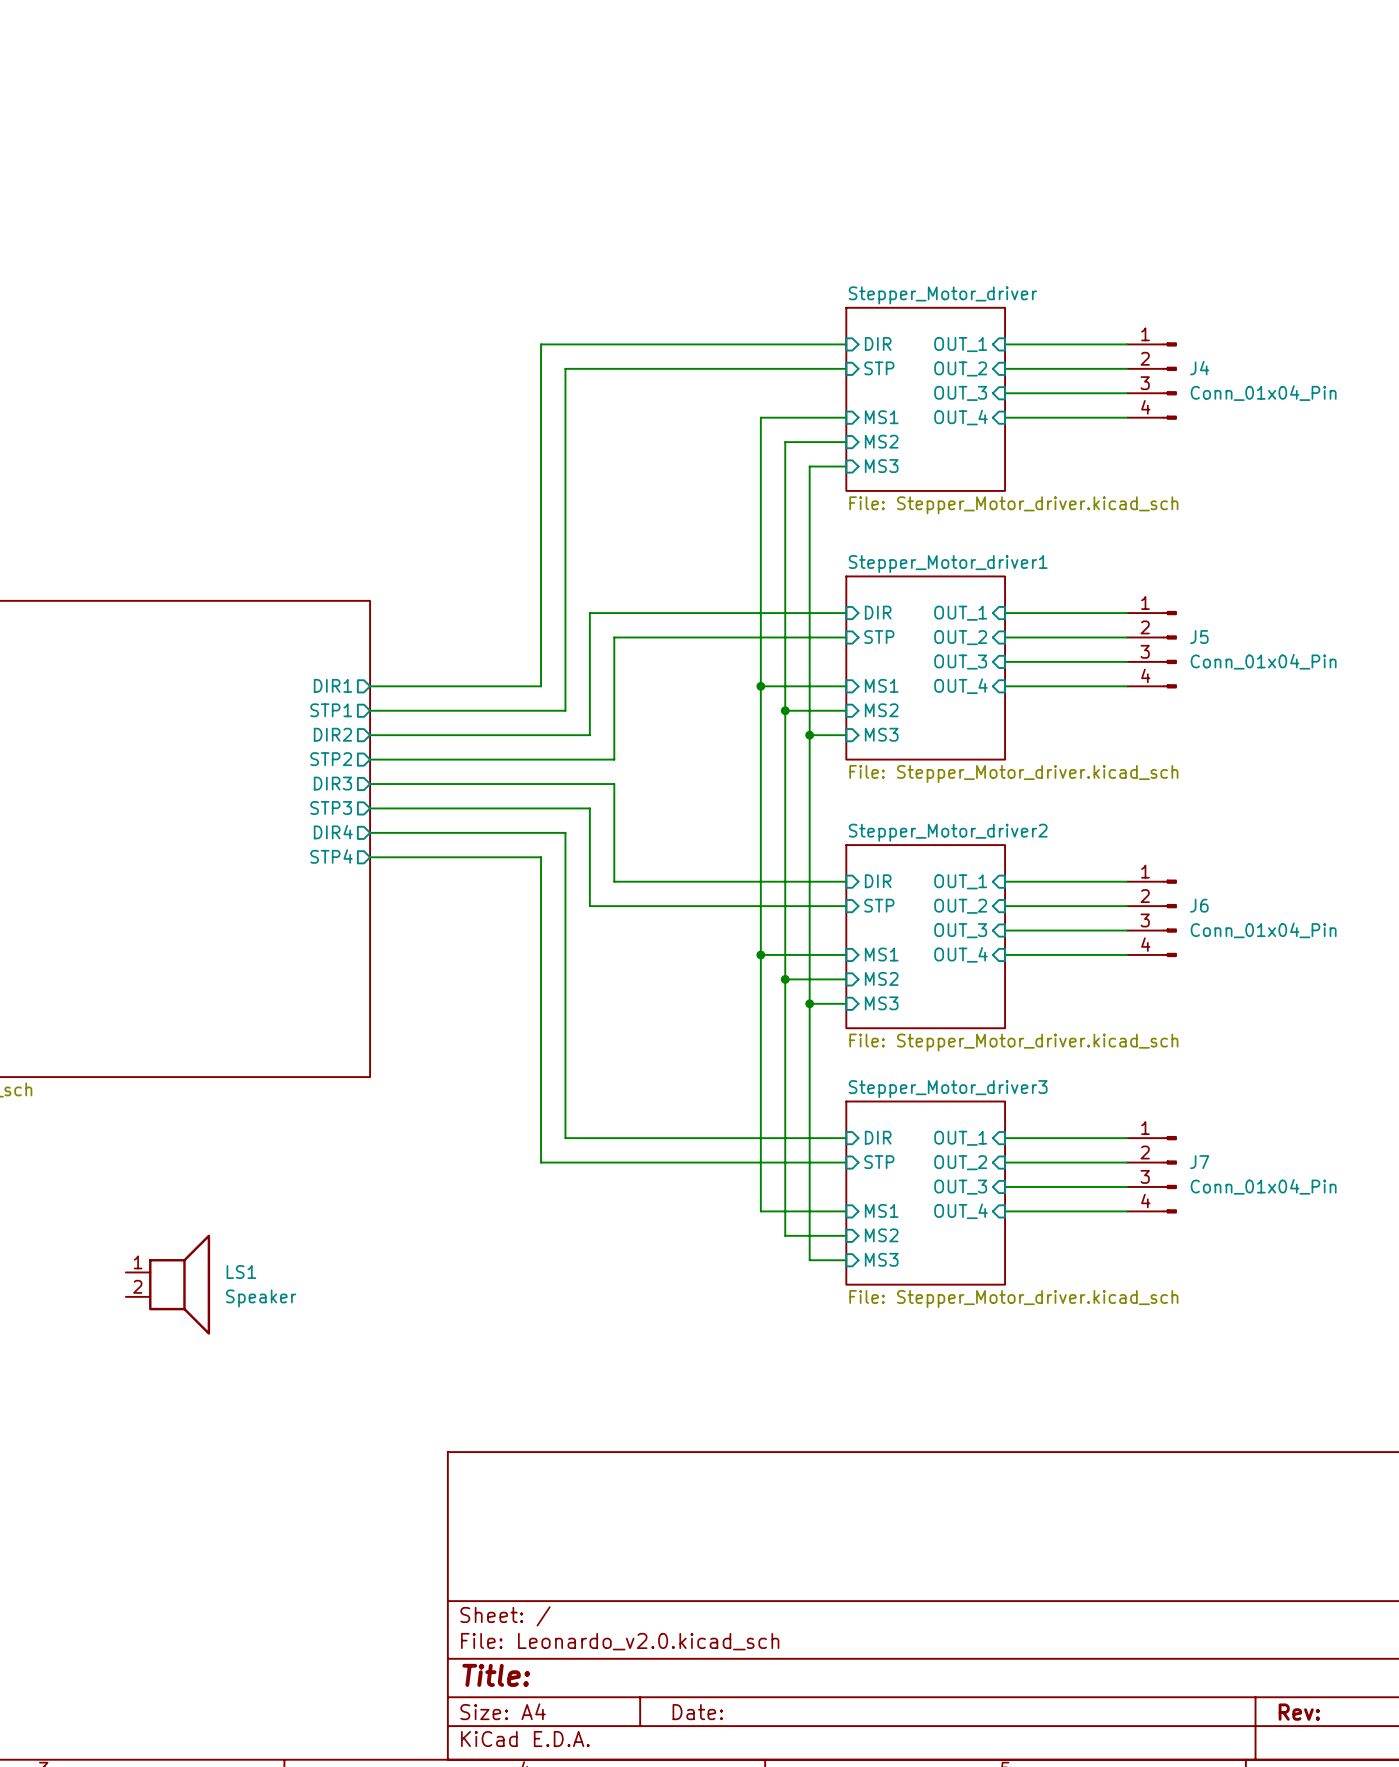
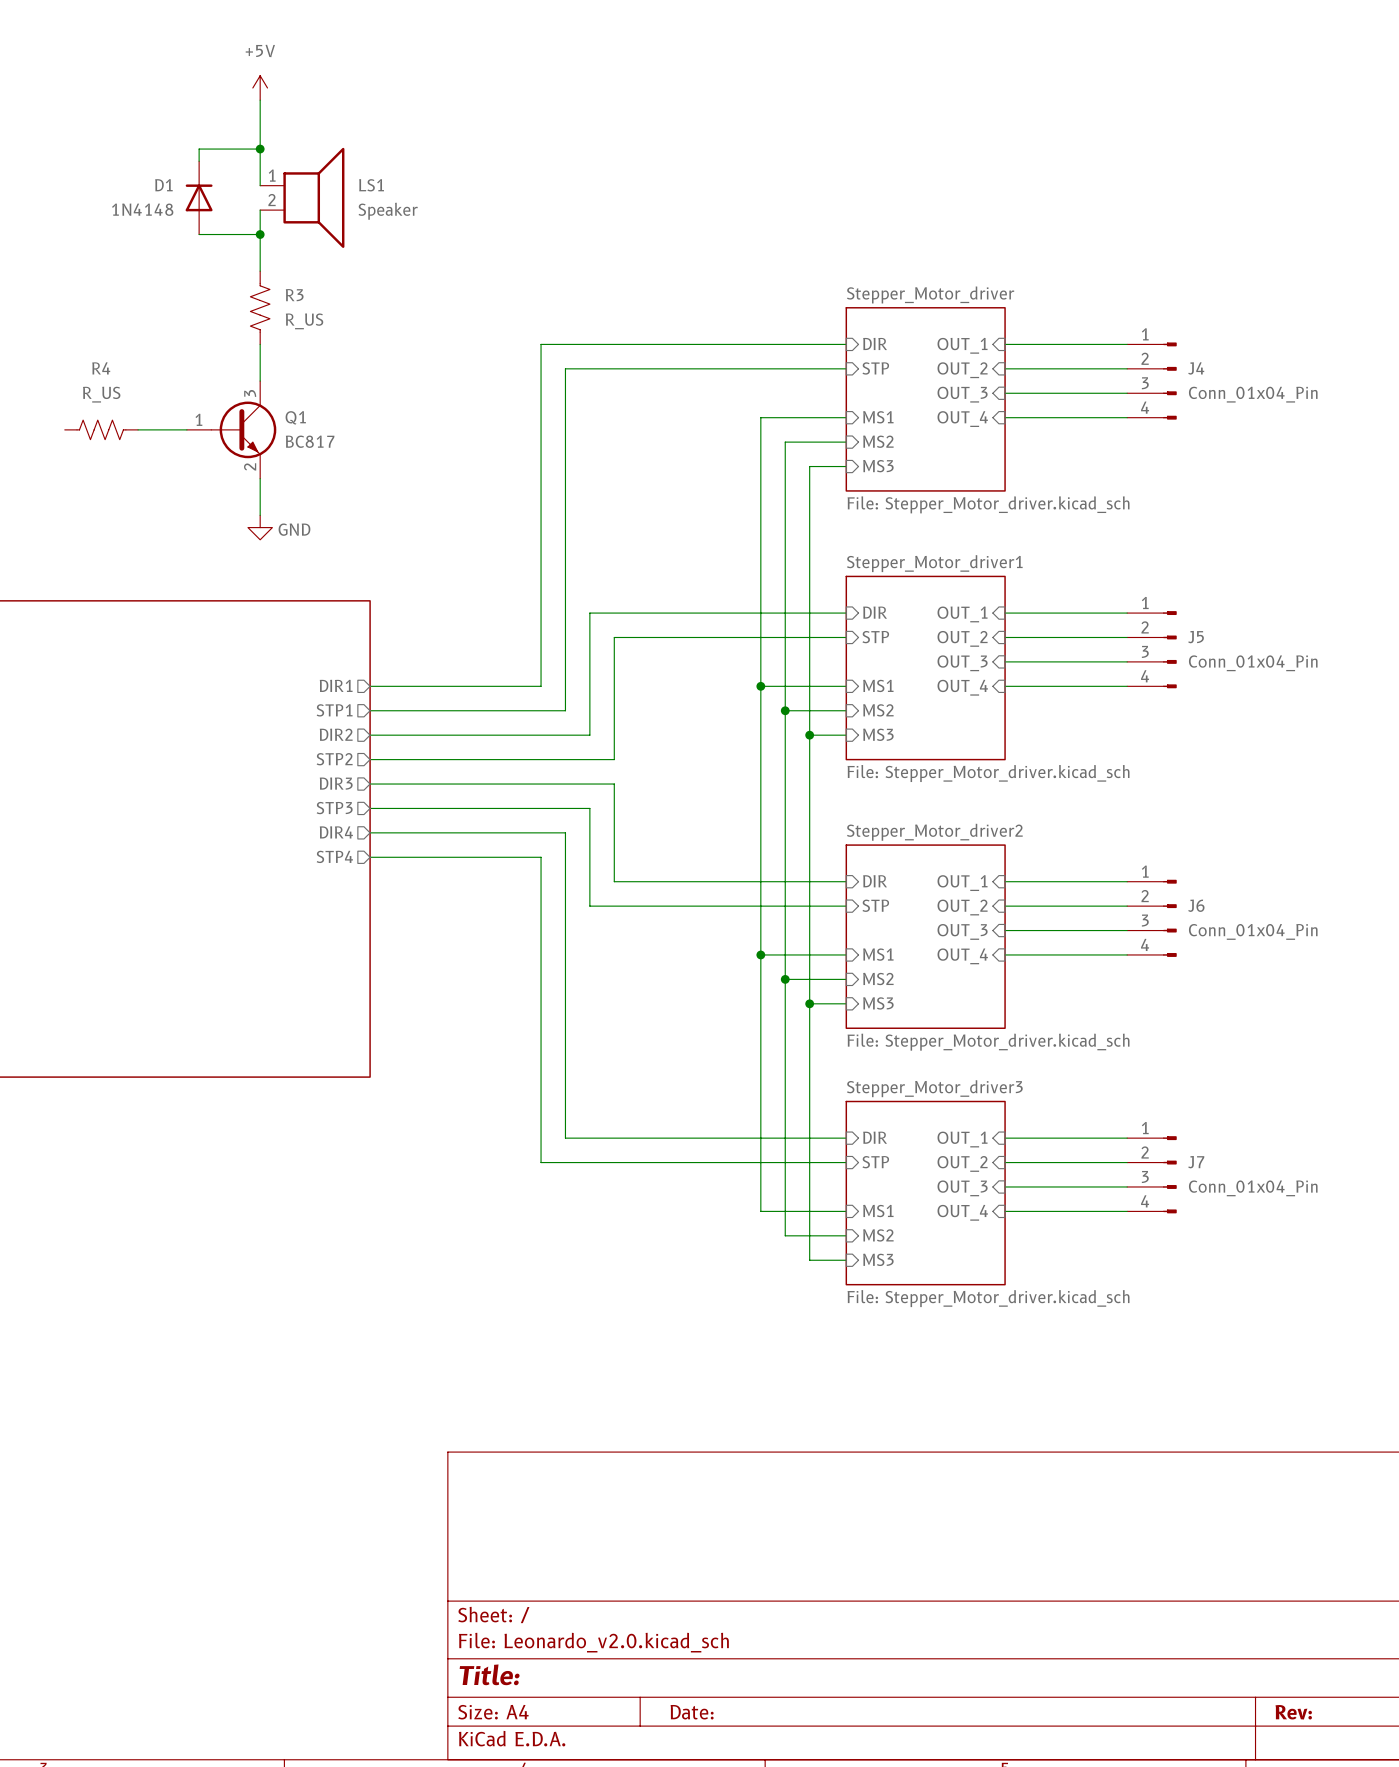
power symbol: none -> +5V (260, 87)
wire: none -> (260, 100) (260, 185)
wire: none -> (260, 149) (199, 149) (199, 161)
junction: none -> (260, 149)
D1: none -> 1N4148 (199, 197)
wire: none -> (260, 210) (260, 271)
wire: none -> (199, 234) (260, 234)
junction: none -> (260, 234)
R3: none -> R_US (260, 307)
wire: none -> (260, 344) (260, 381)
R4: none -> R_US (101, 429)
wire: none -> (138, 429) (186, 429)
Q1: none -> BC817 (231, 429)
wire: none -> (260, 478) (260, 515)
power symbol: none -> GND (260, 527)
LS1 position: (167, 1284) -> (302, 197)

